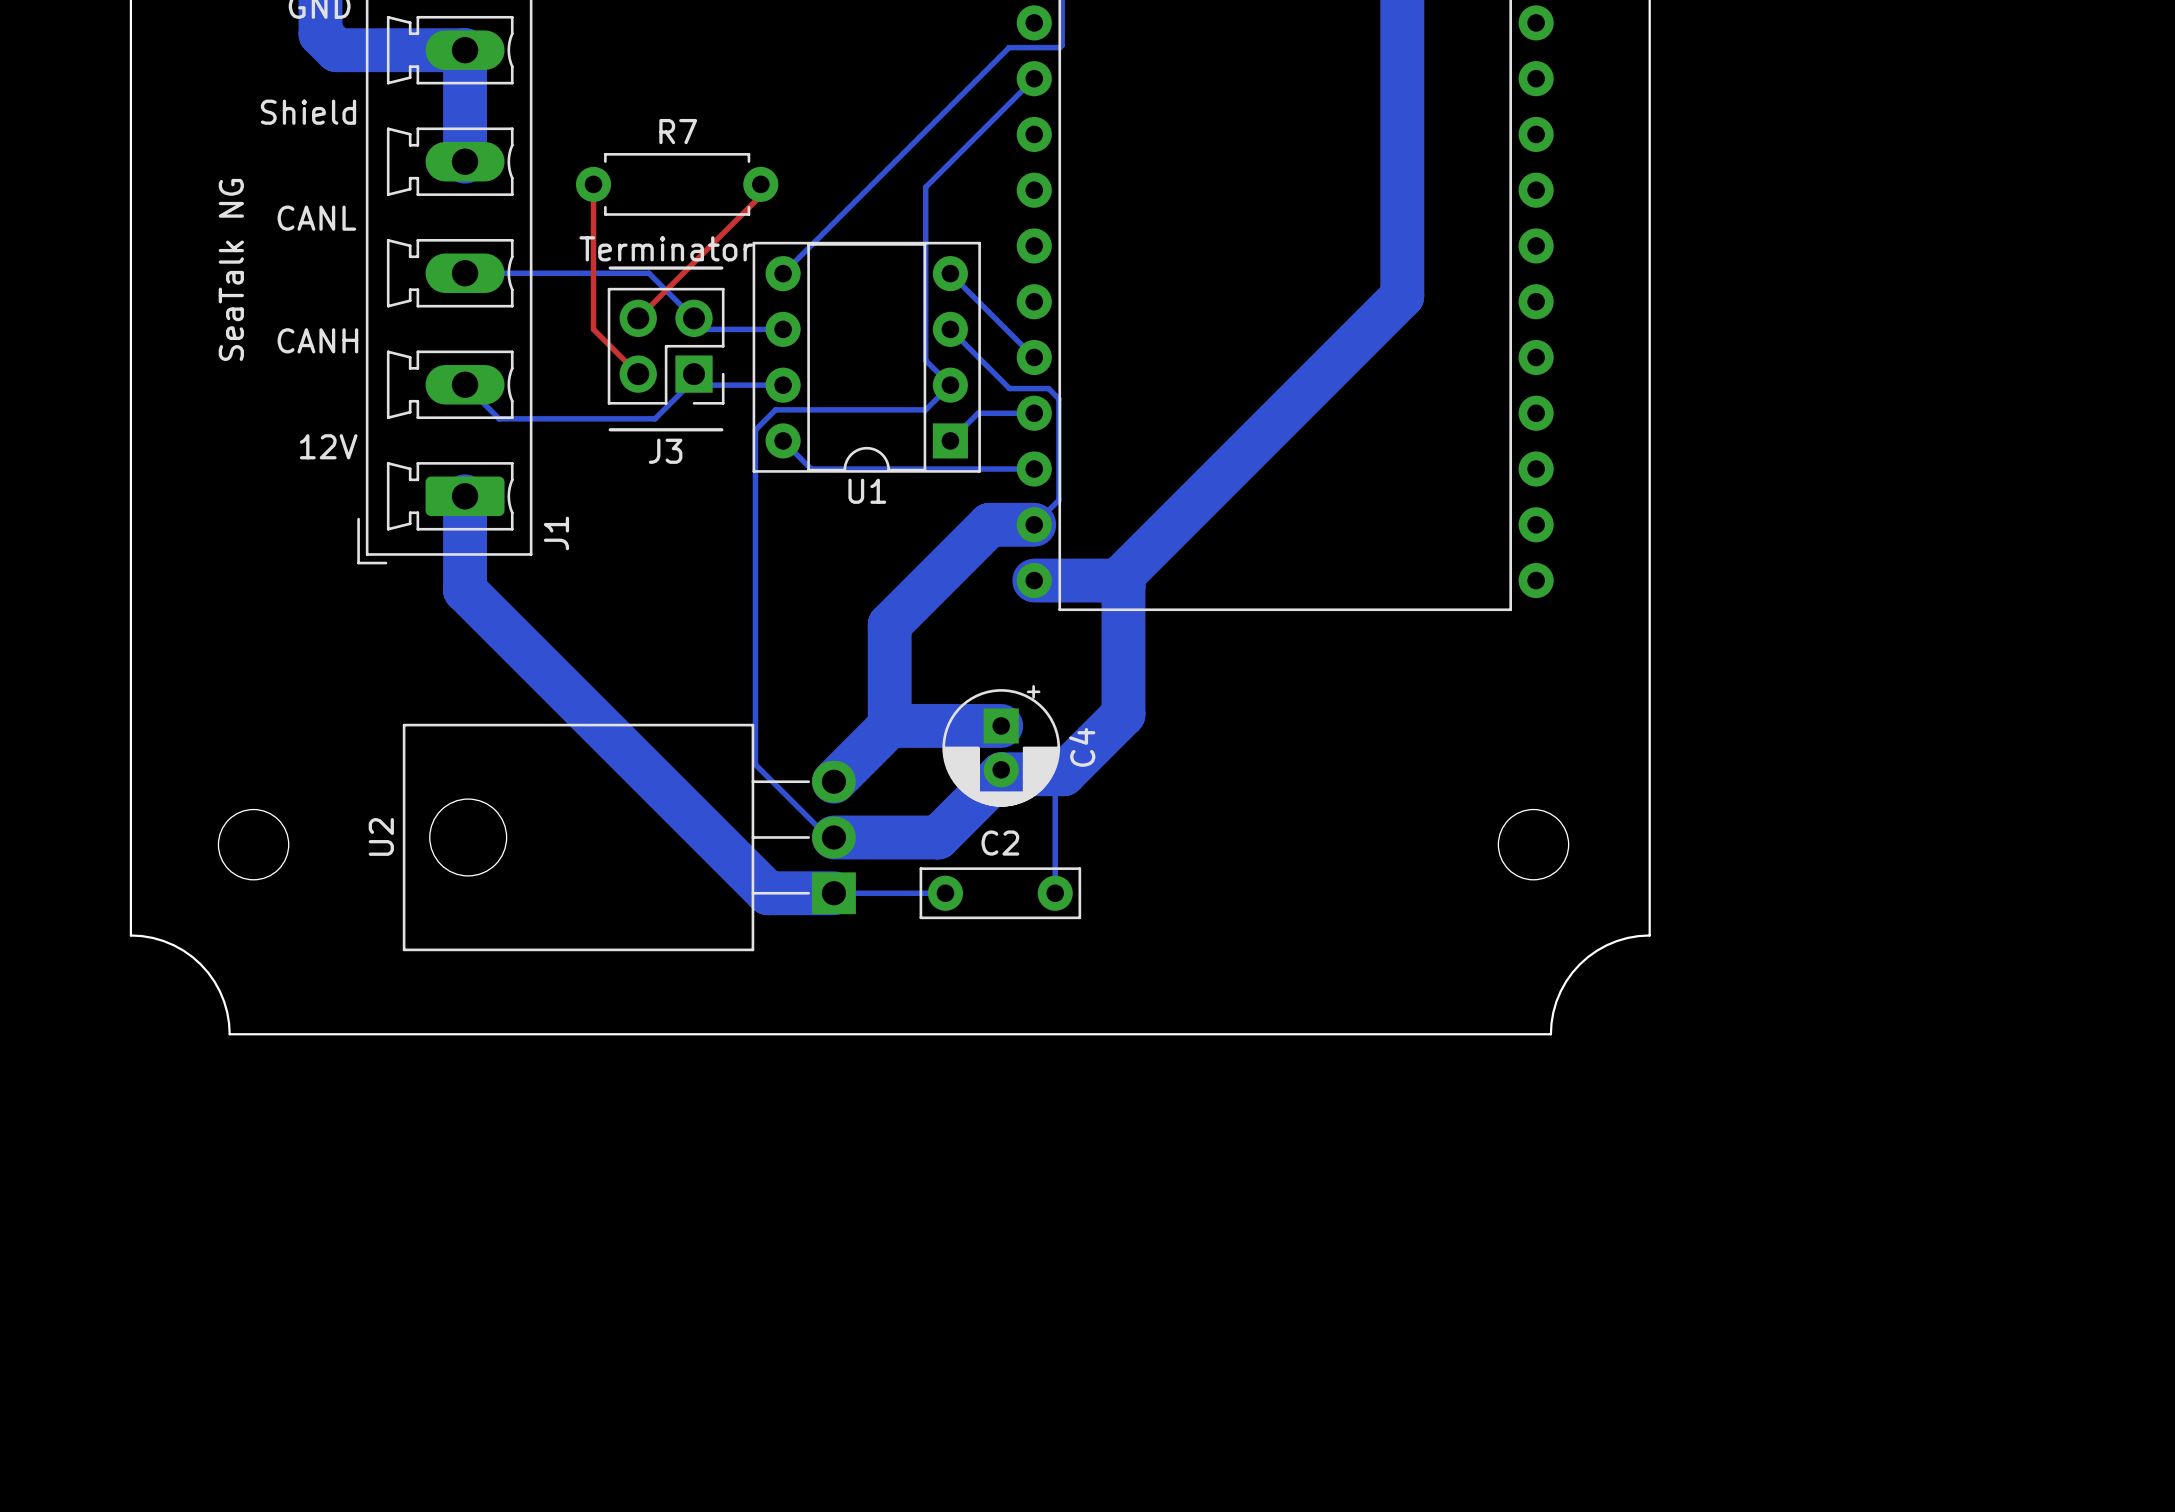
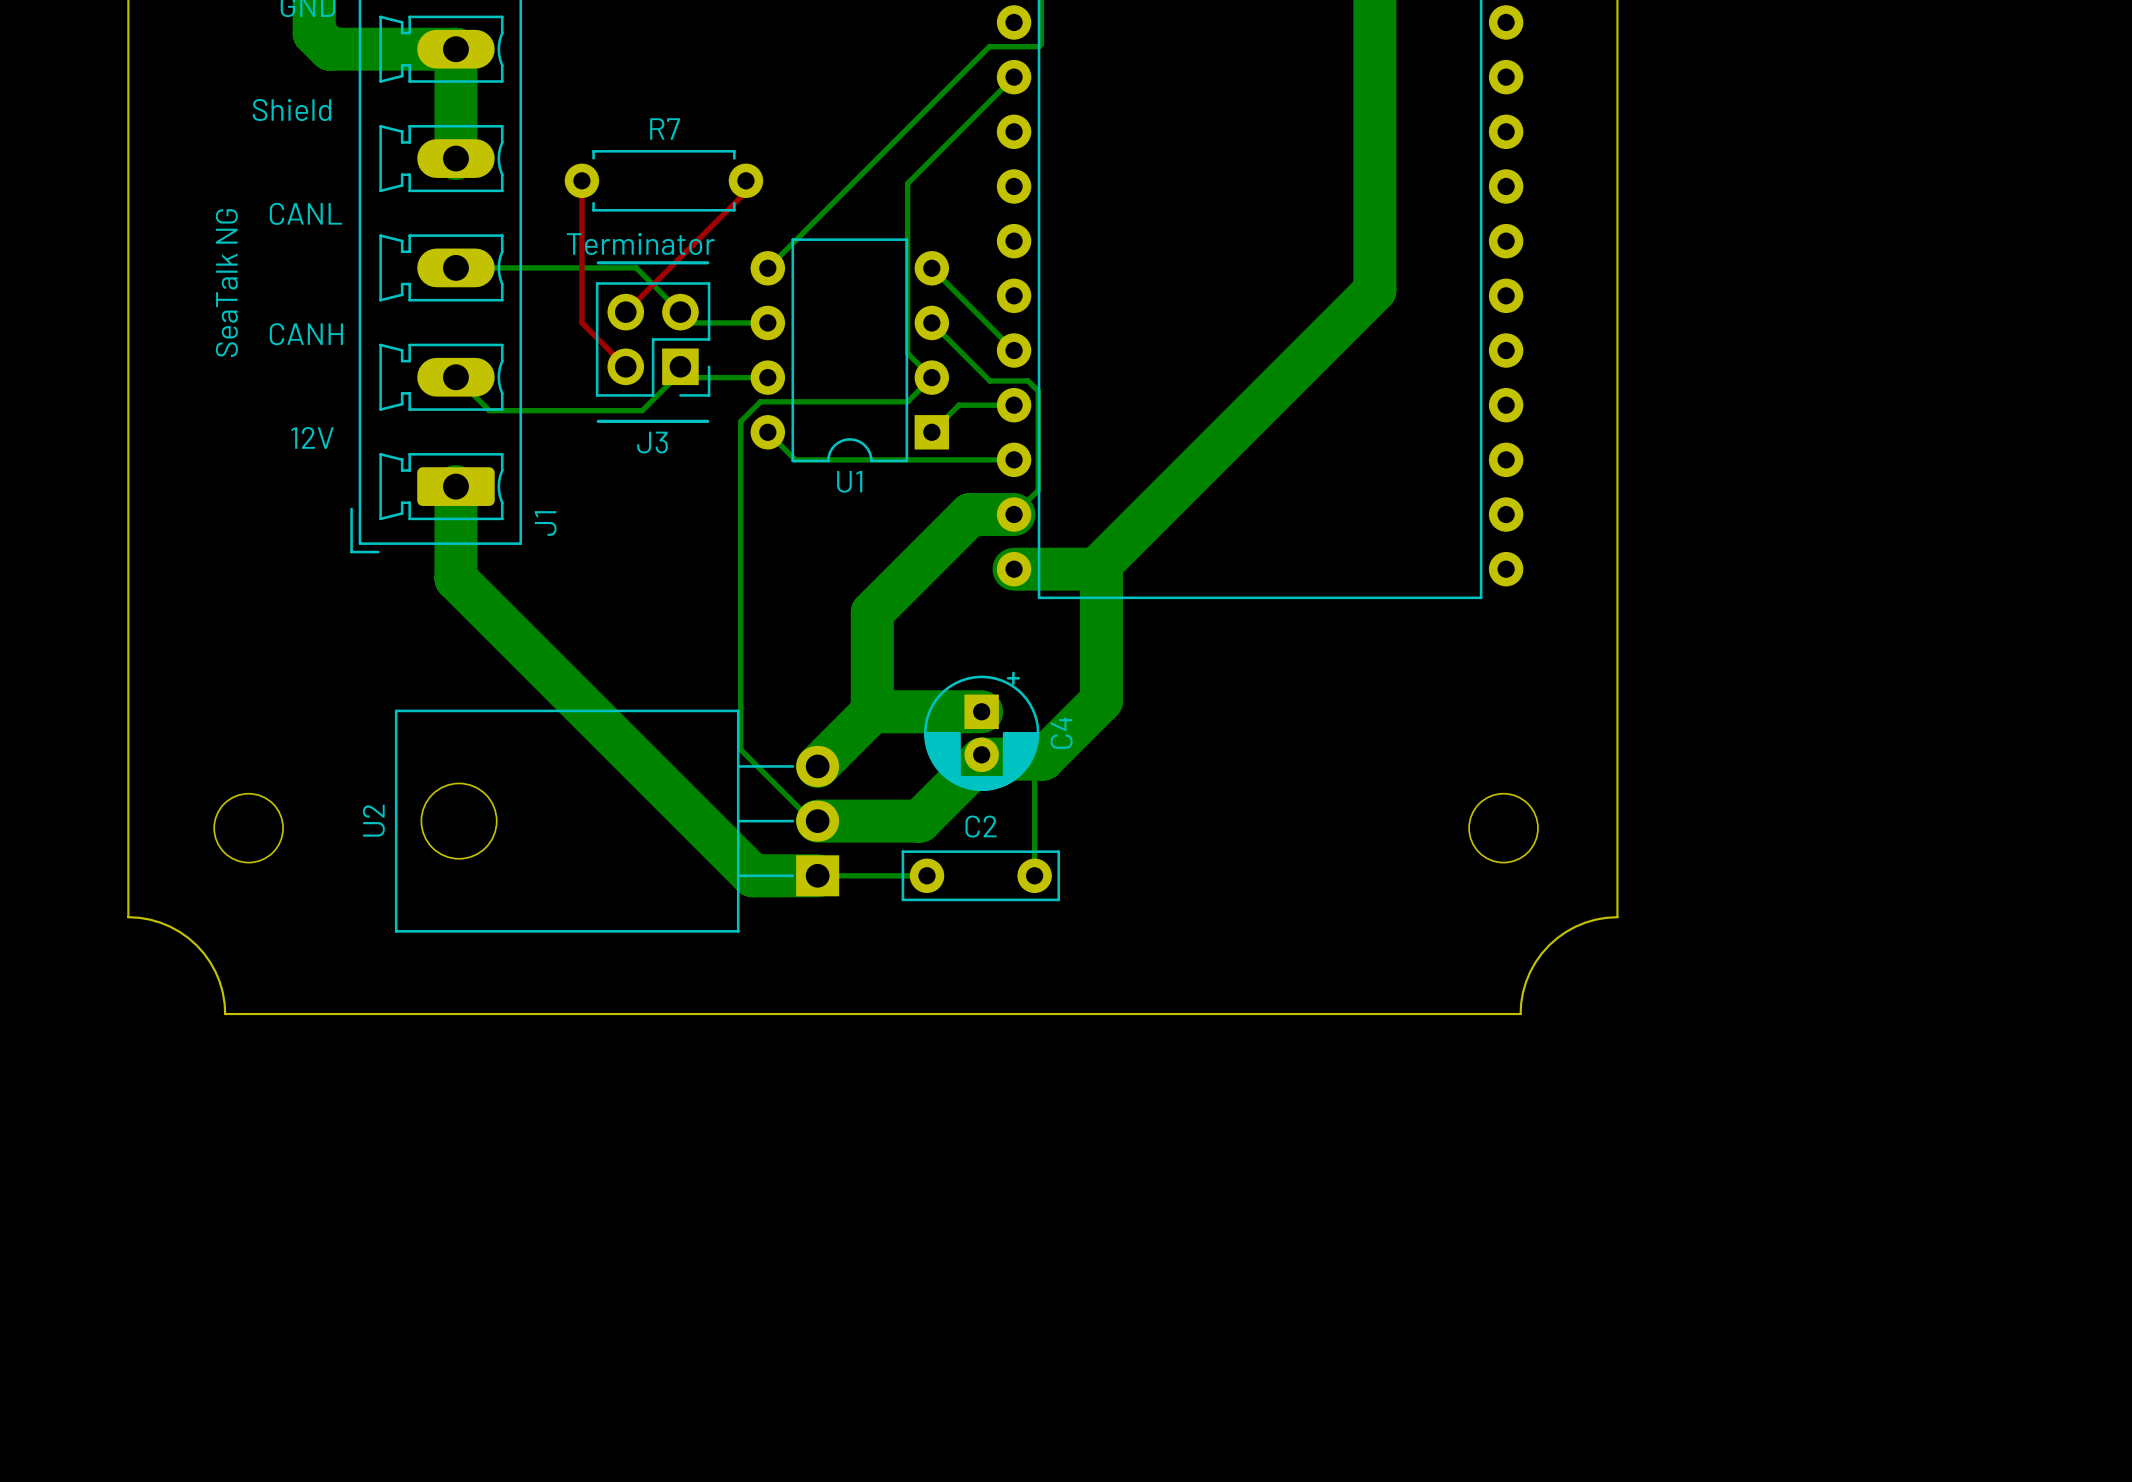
U1 footprint: [752, 241, 981, 473] -> [750, 238, 950, 463]

